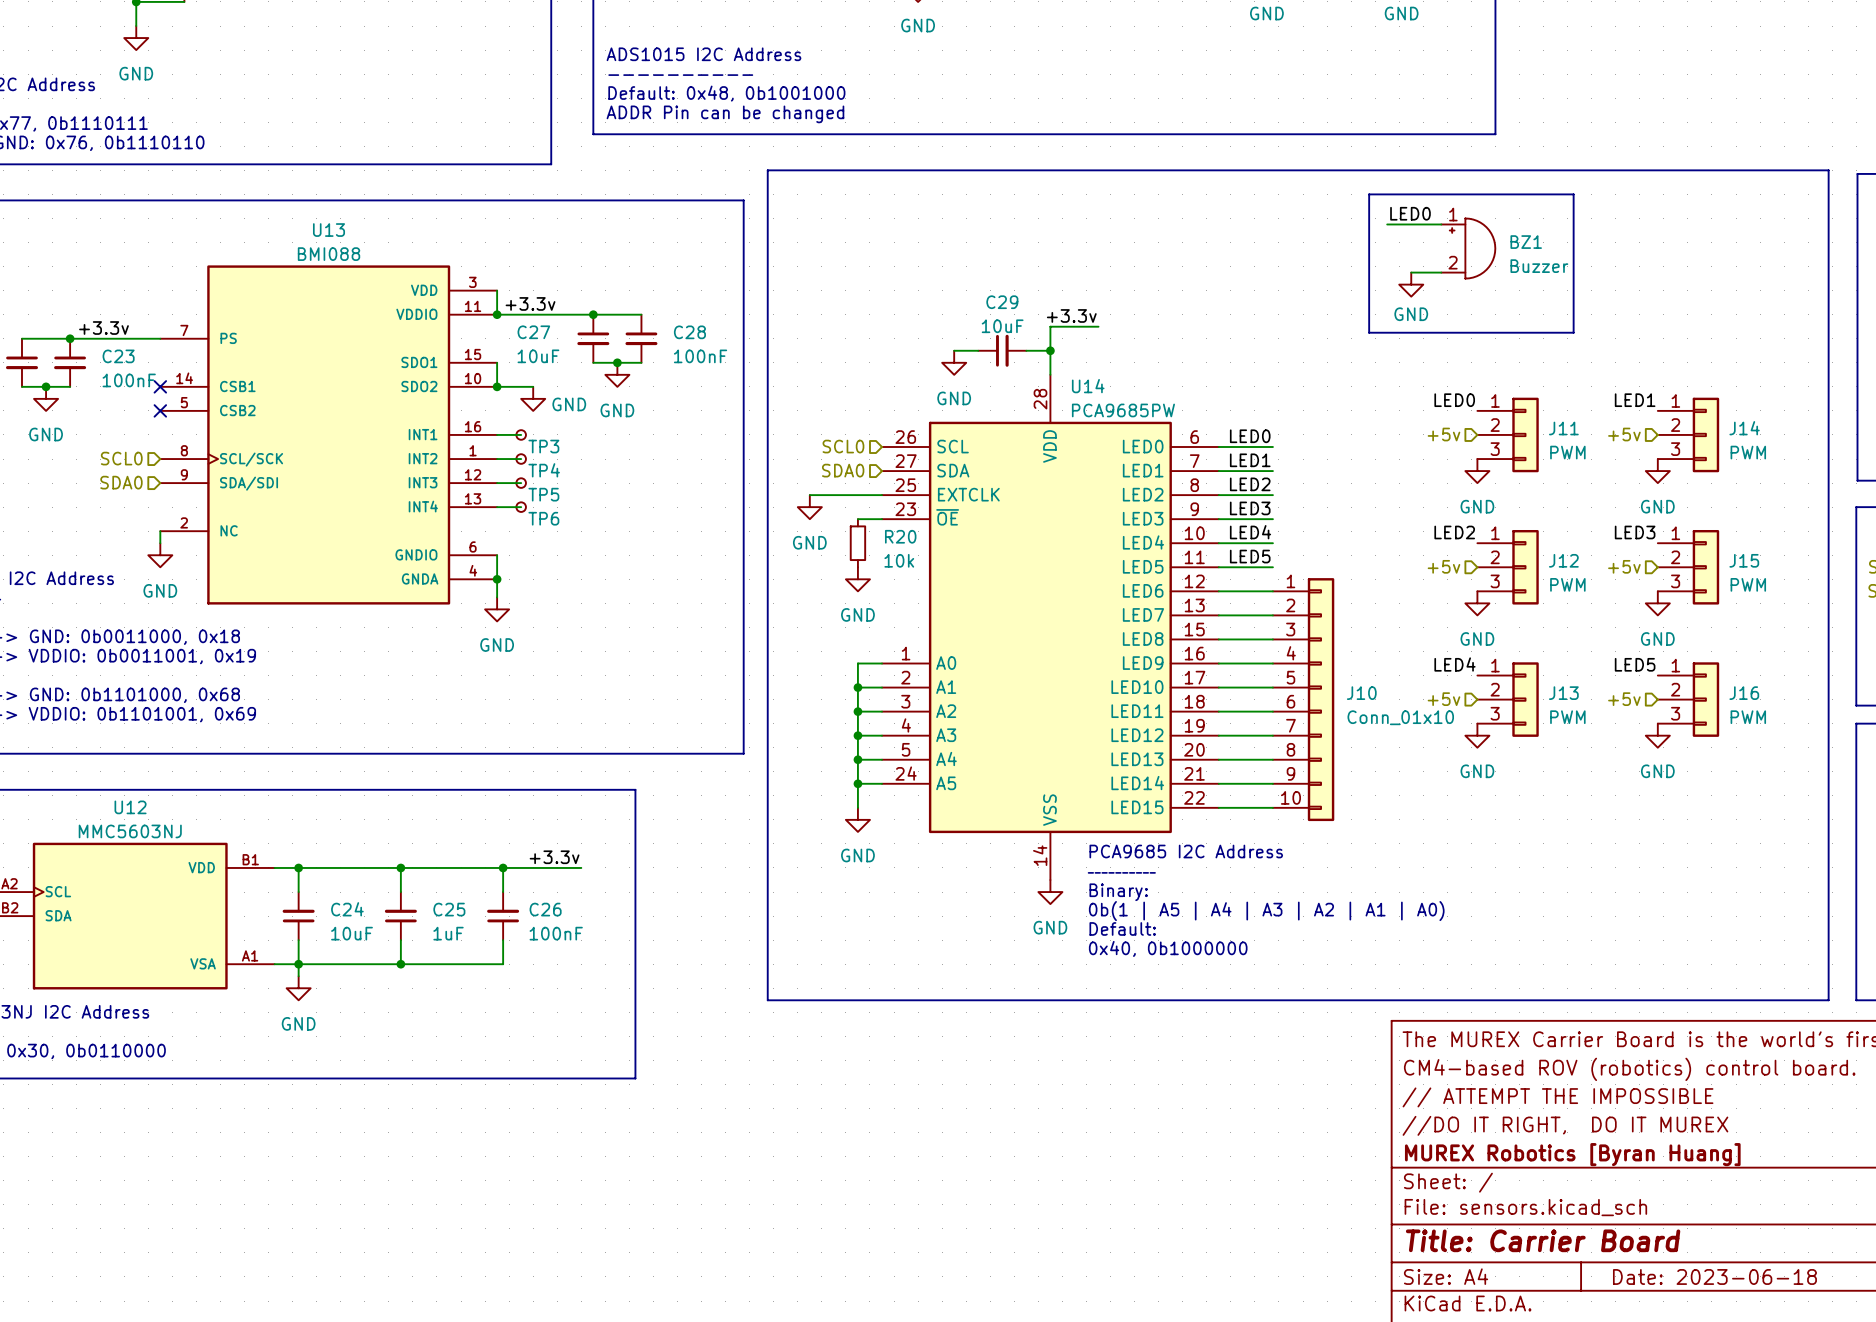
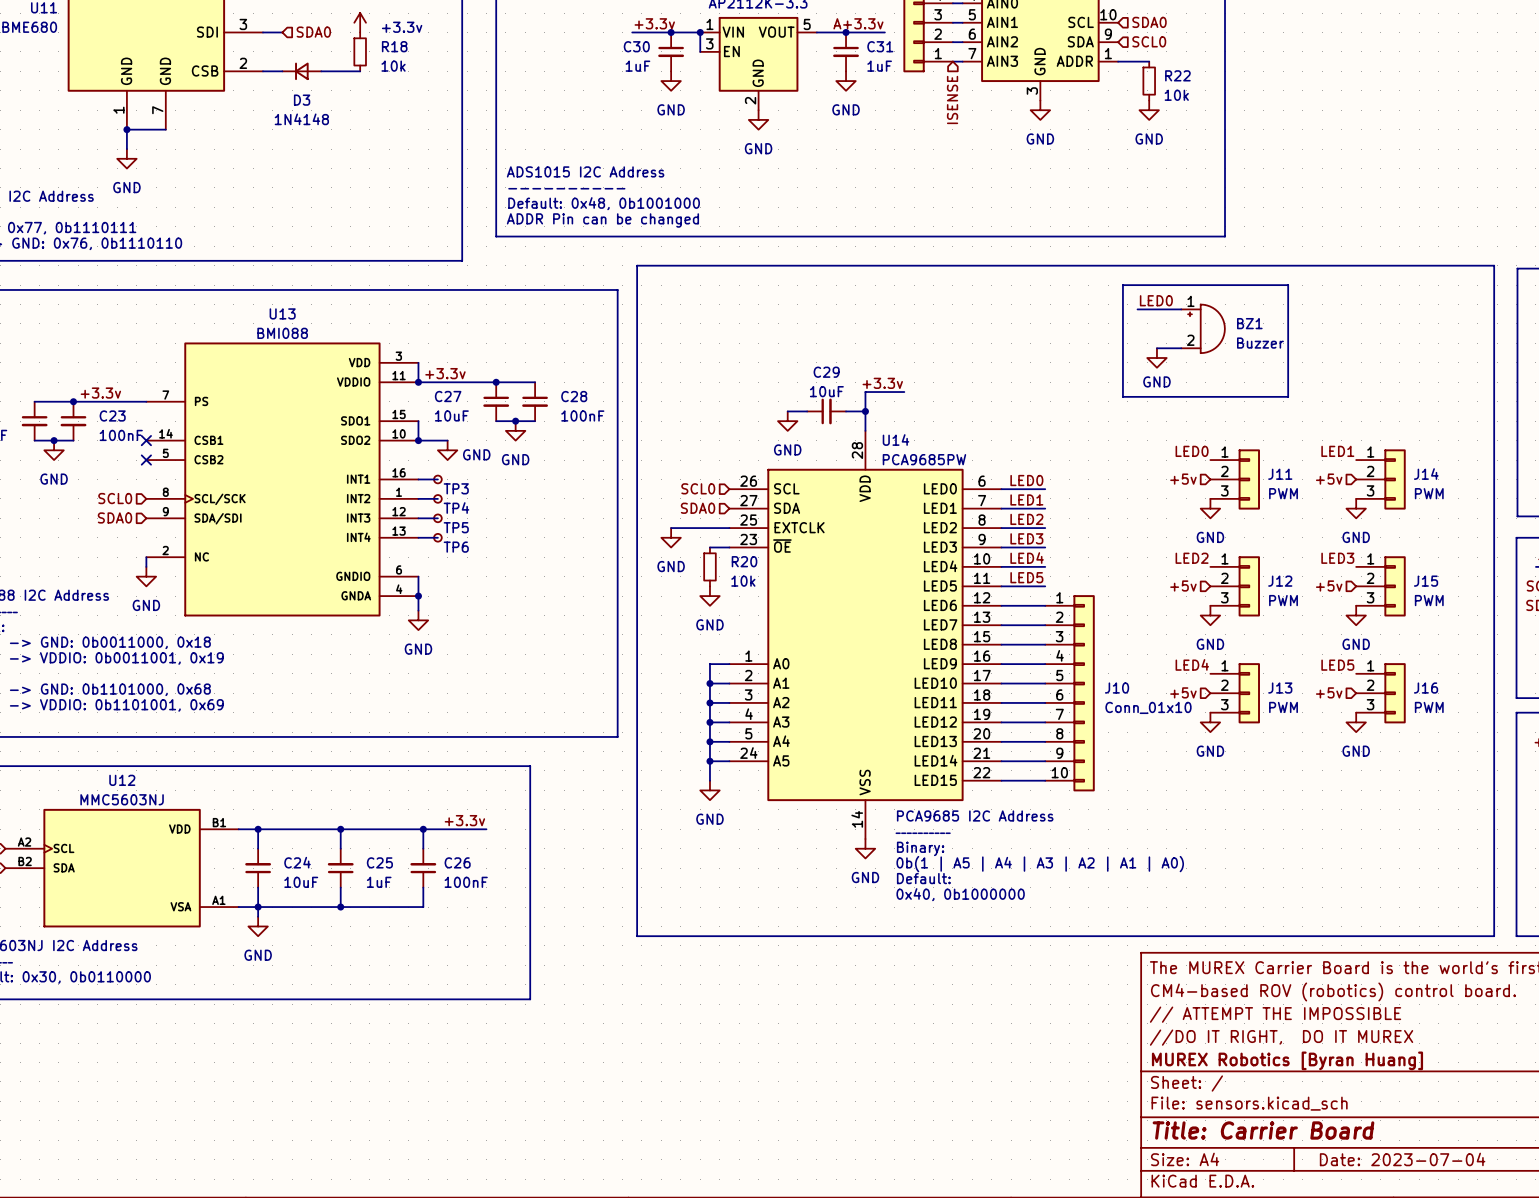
title block: Date: 2023-06-18 (1714, 1276) -> Date: 2023-07-04 (1402, 1159)

